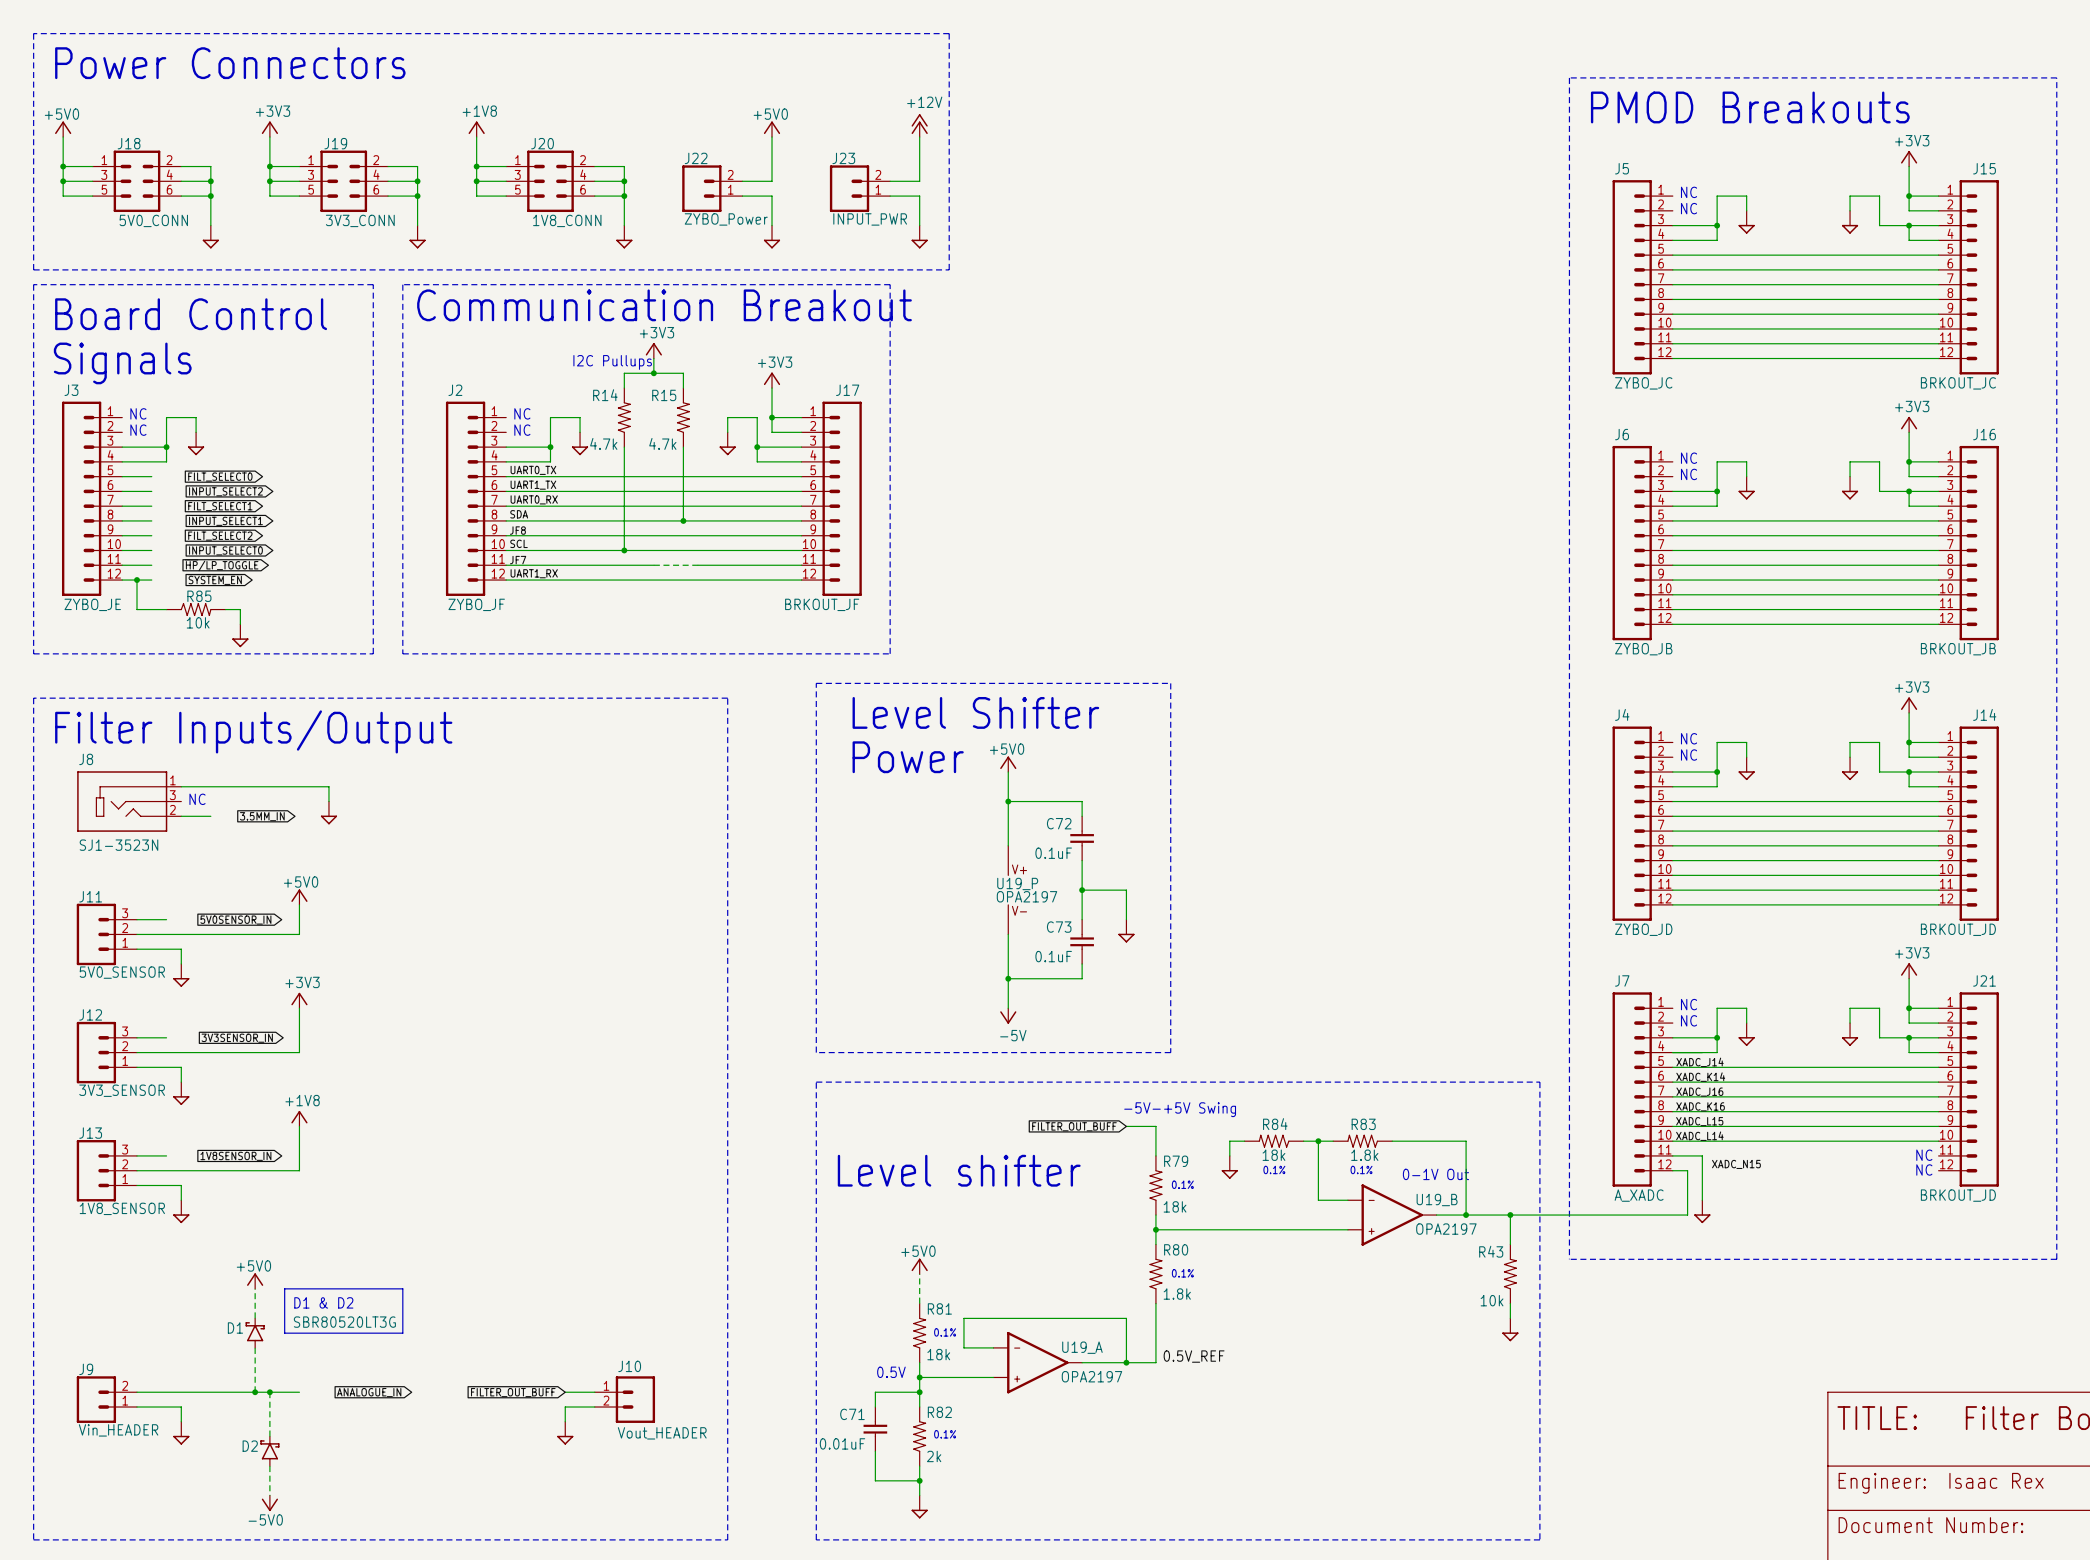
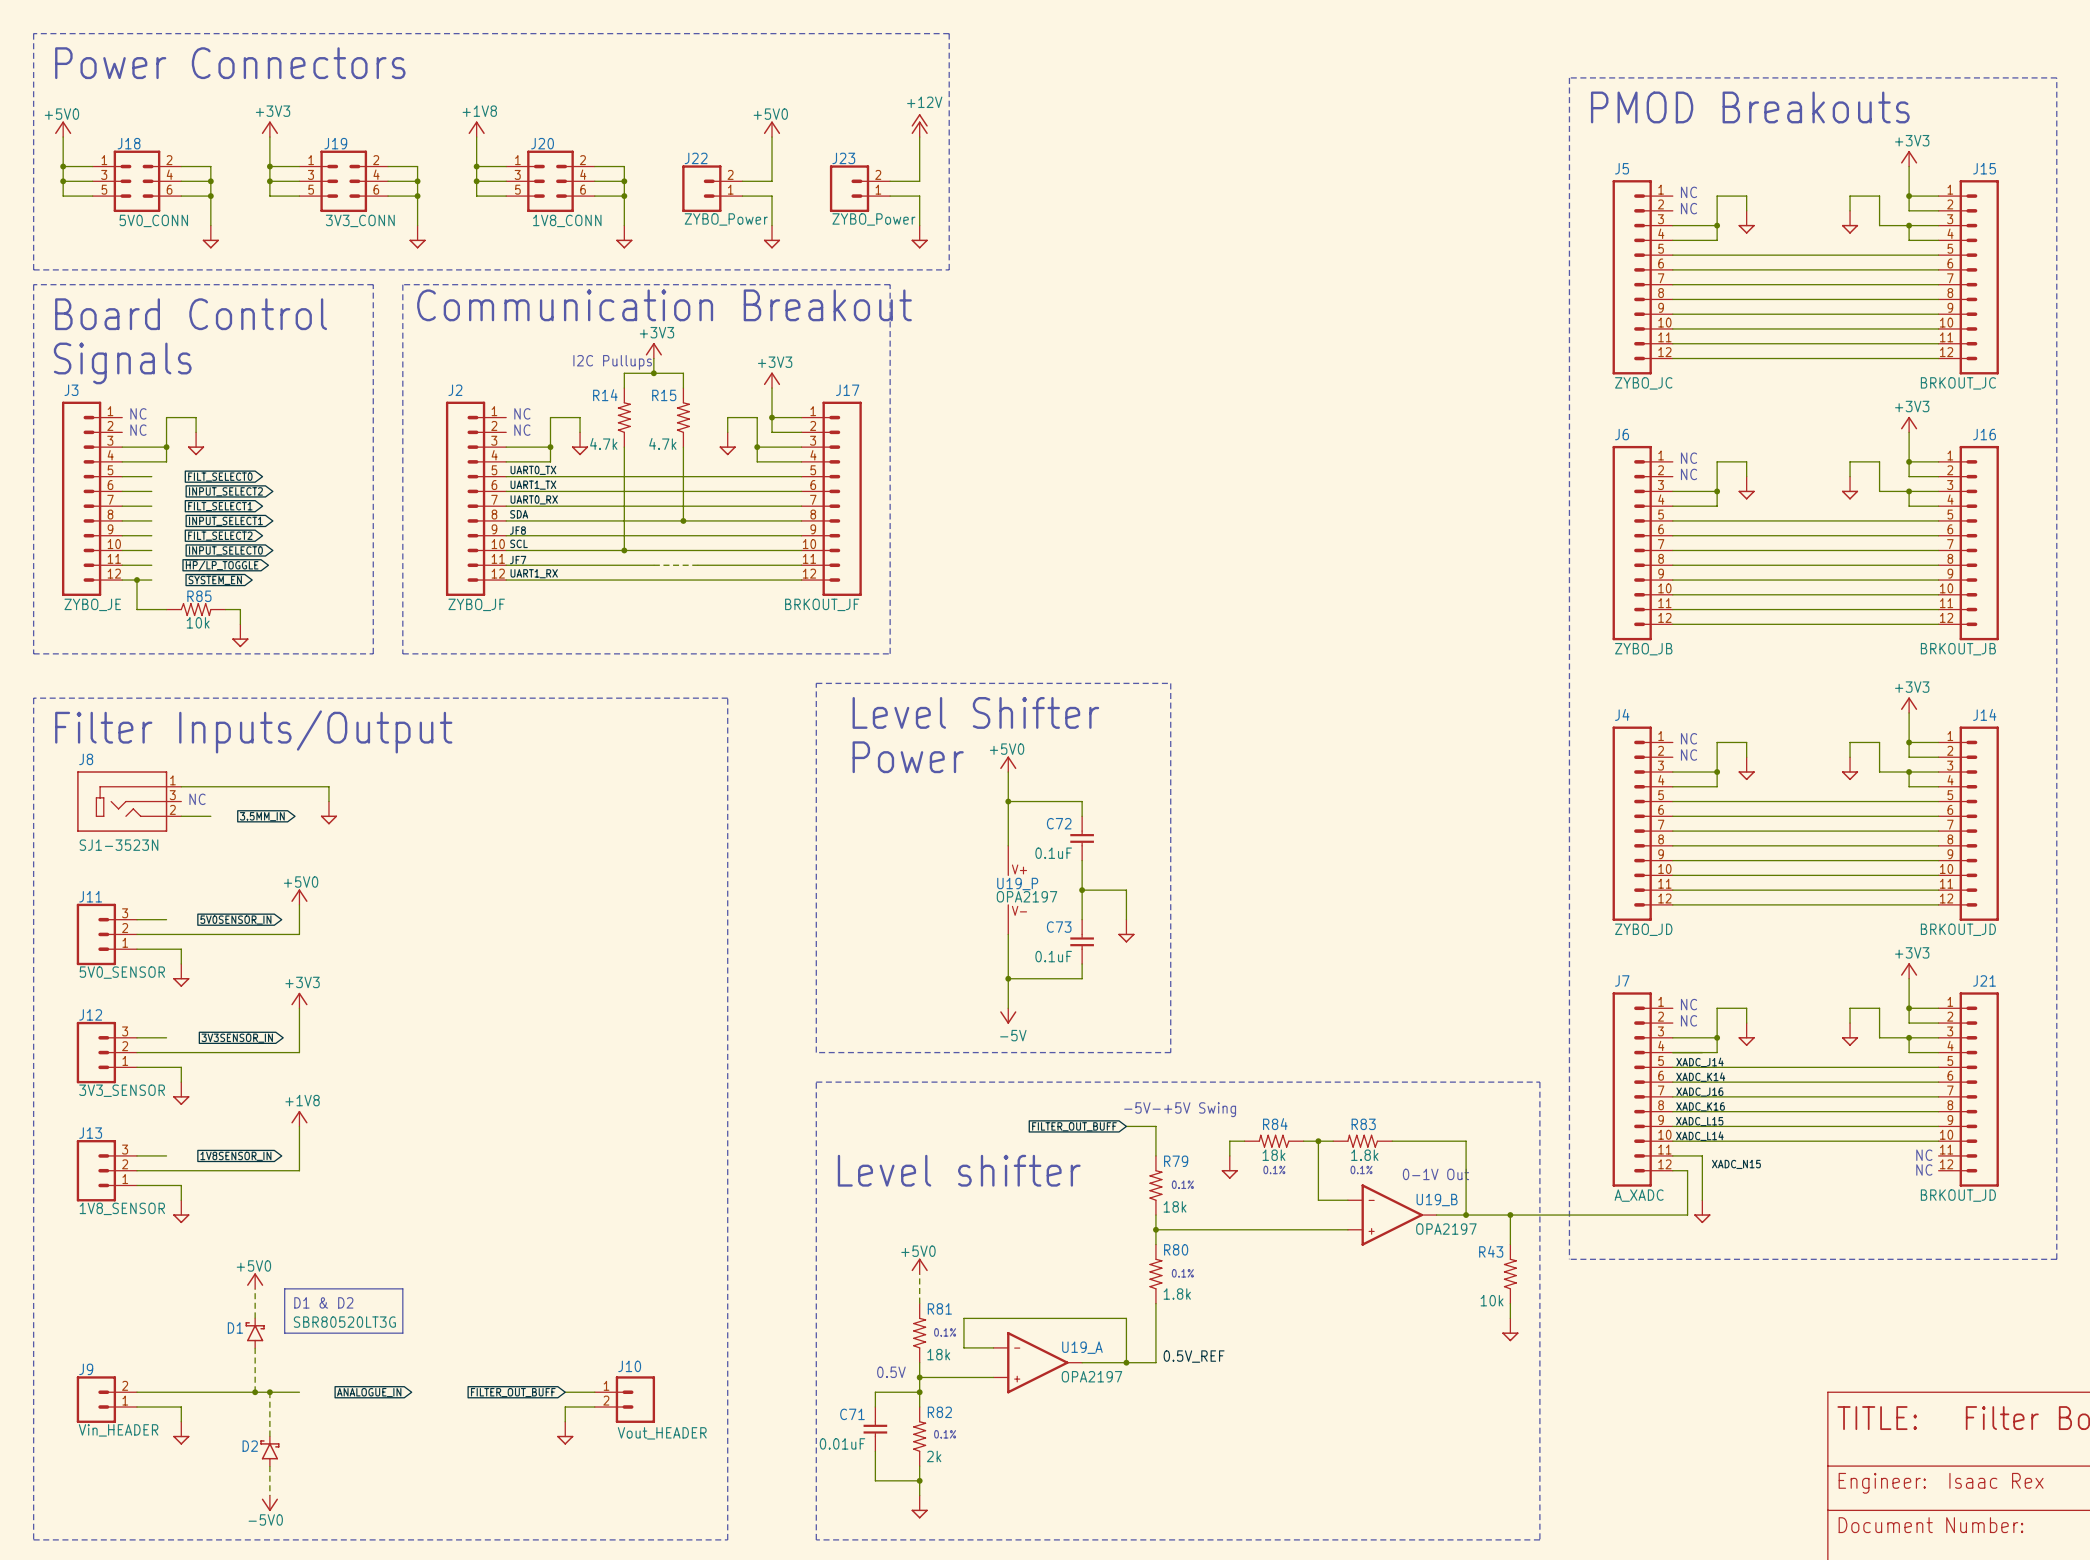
J23 value: INPUT_PWR (870, 219) -> ZYBO_Power (873, 219)

